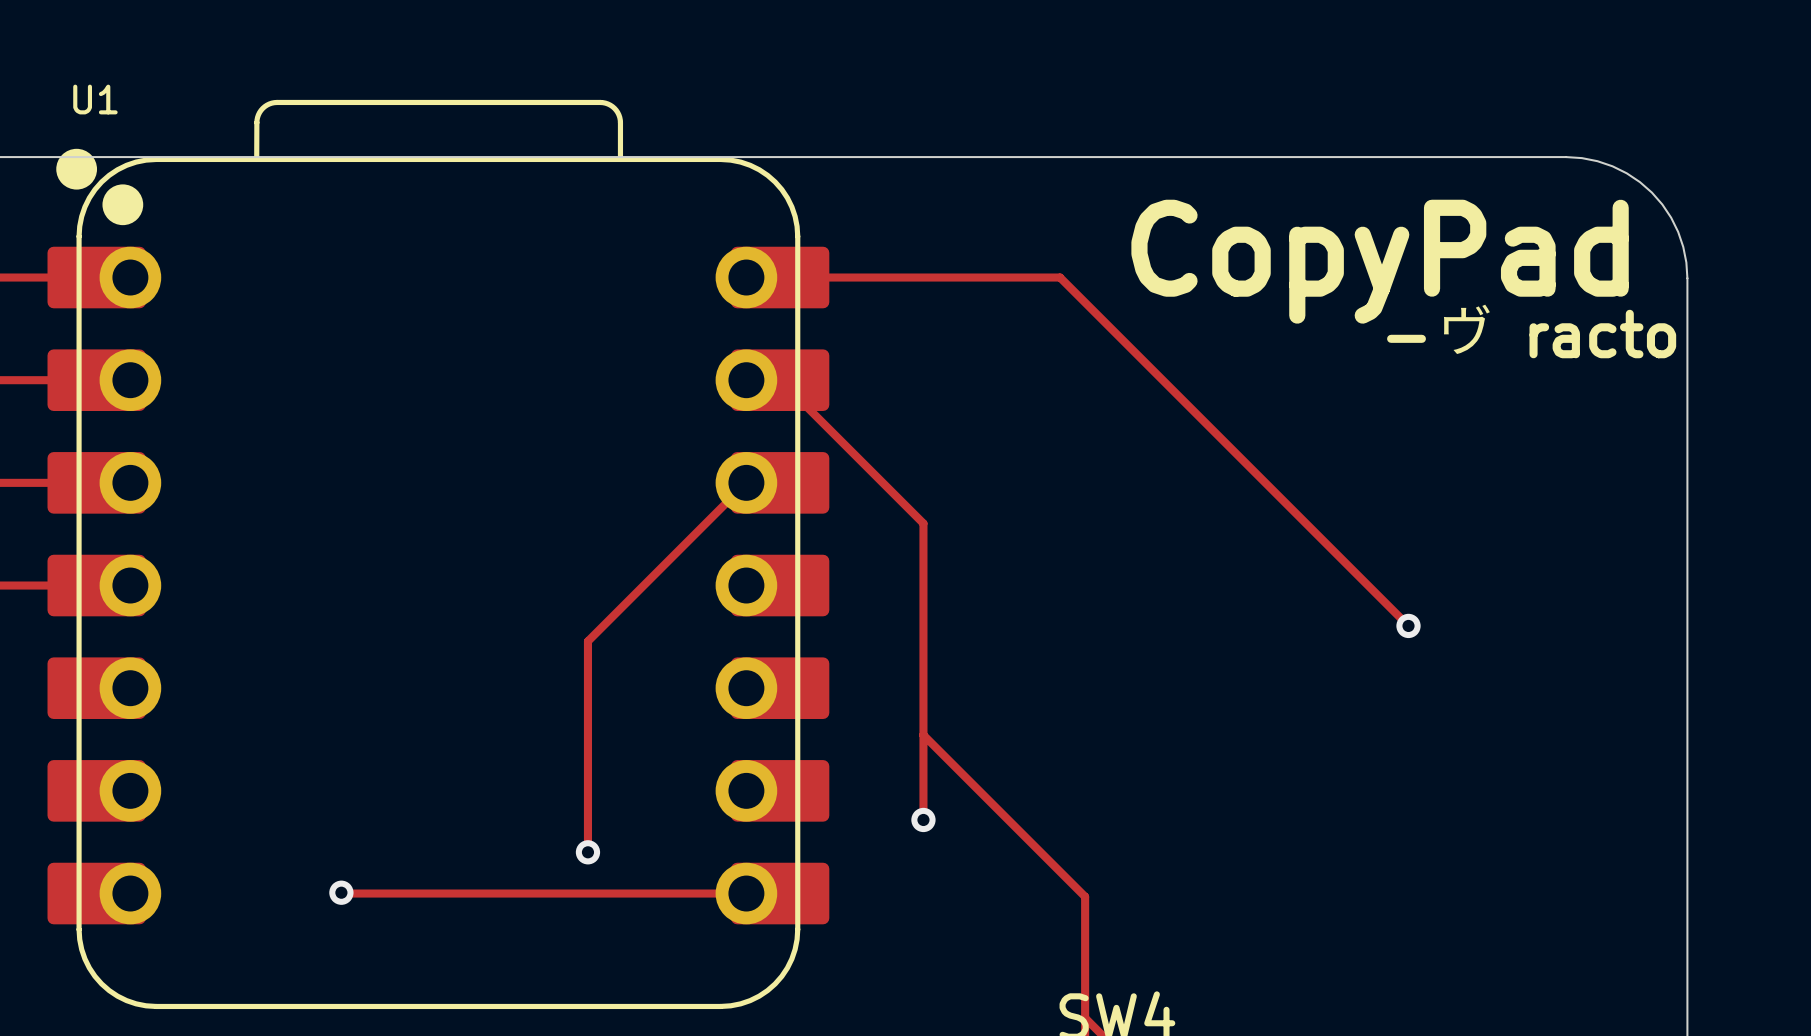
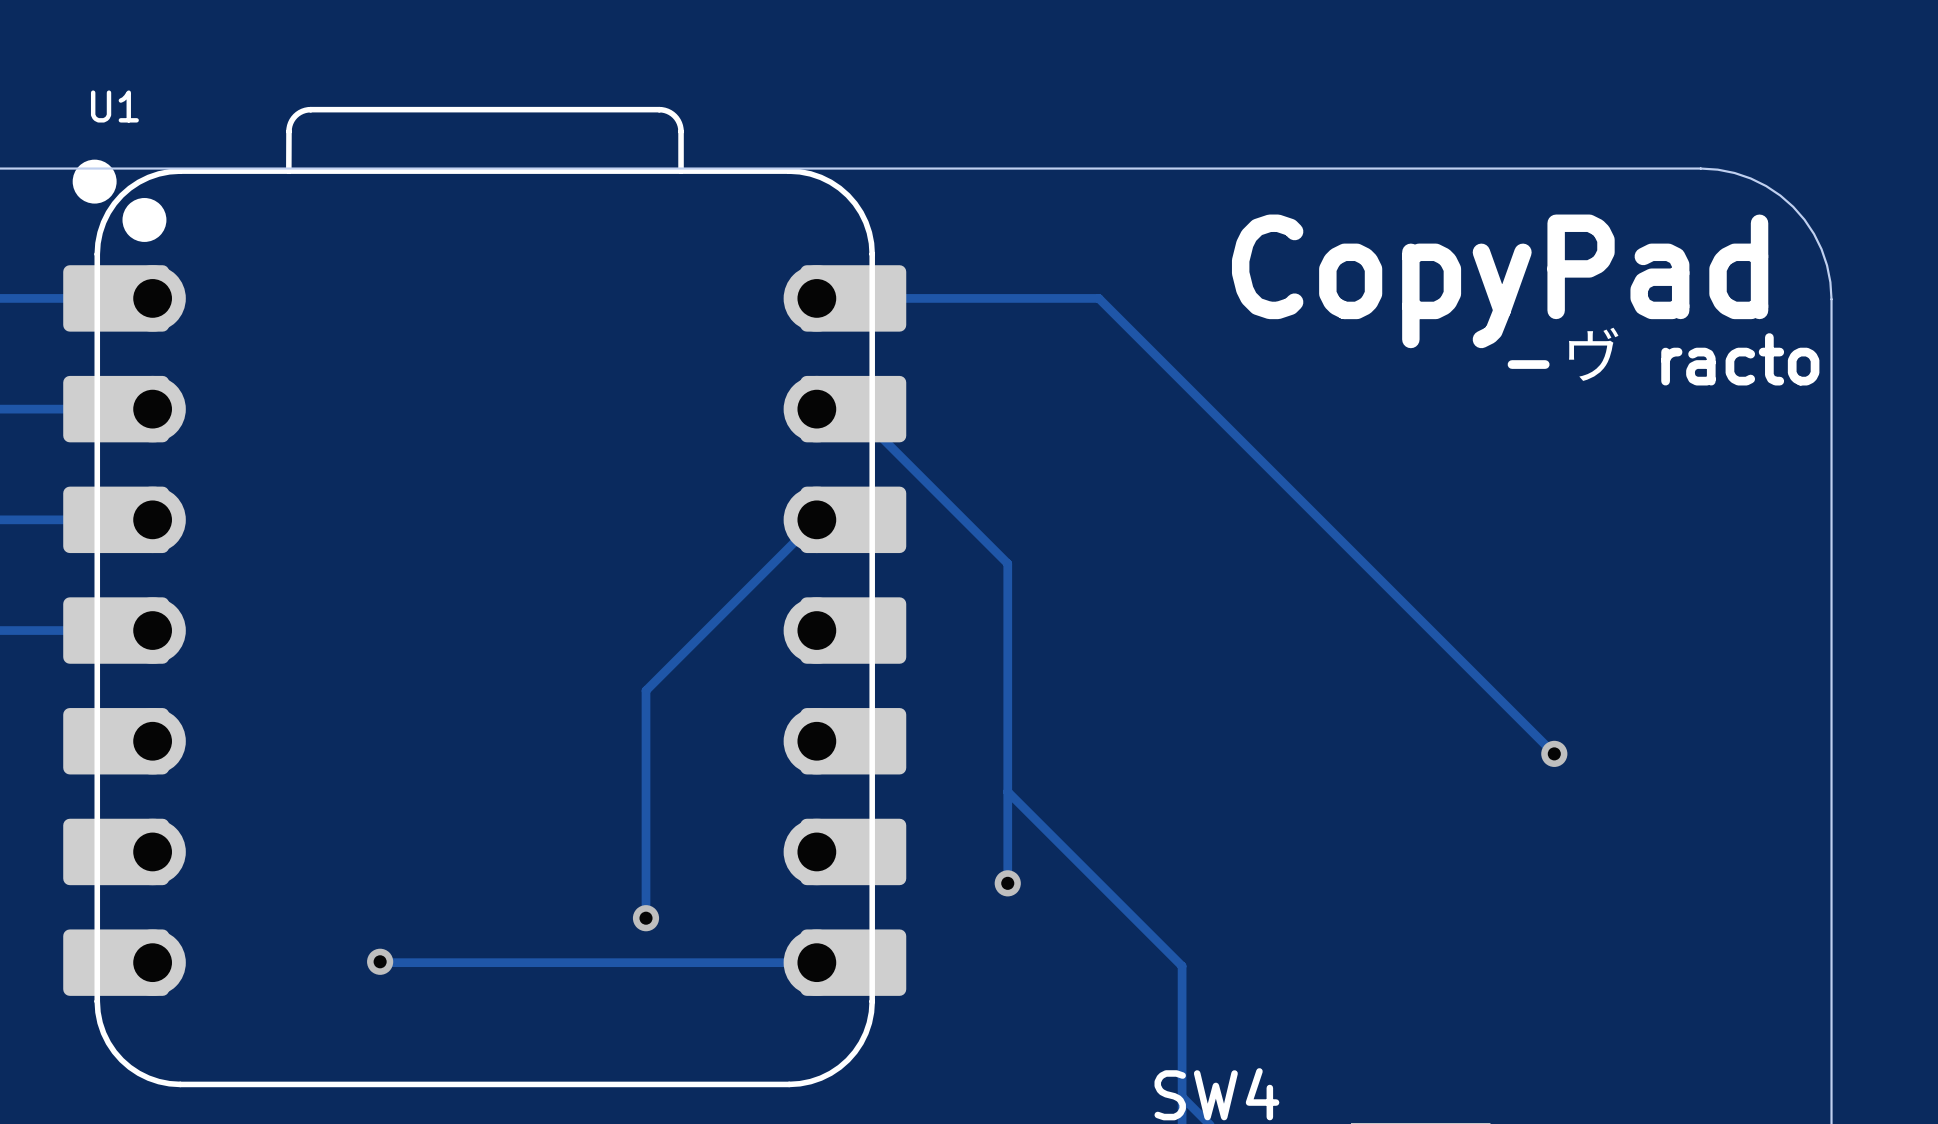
track: (1007, 277) (1060, 277) (1408, 625) -> (1098, 298) (1554, 753)
via position: (1408, 625) -> (1554, 753)

